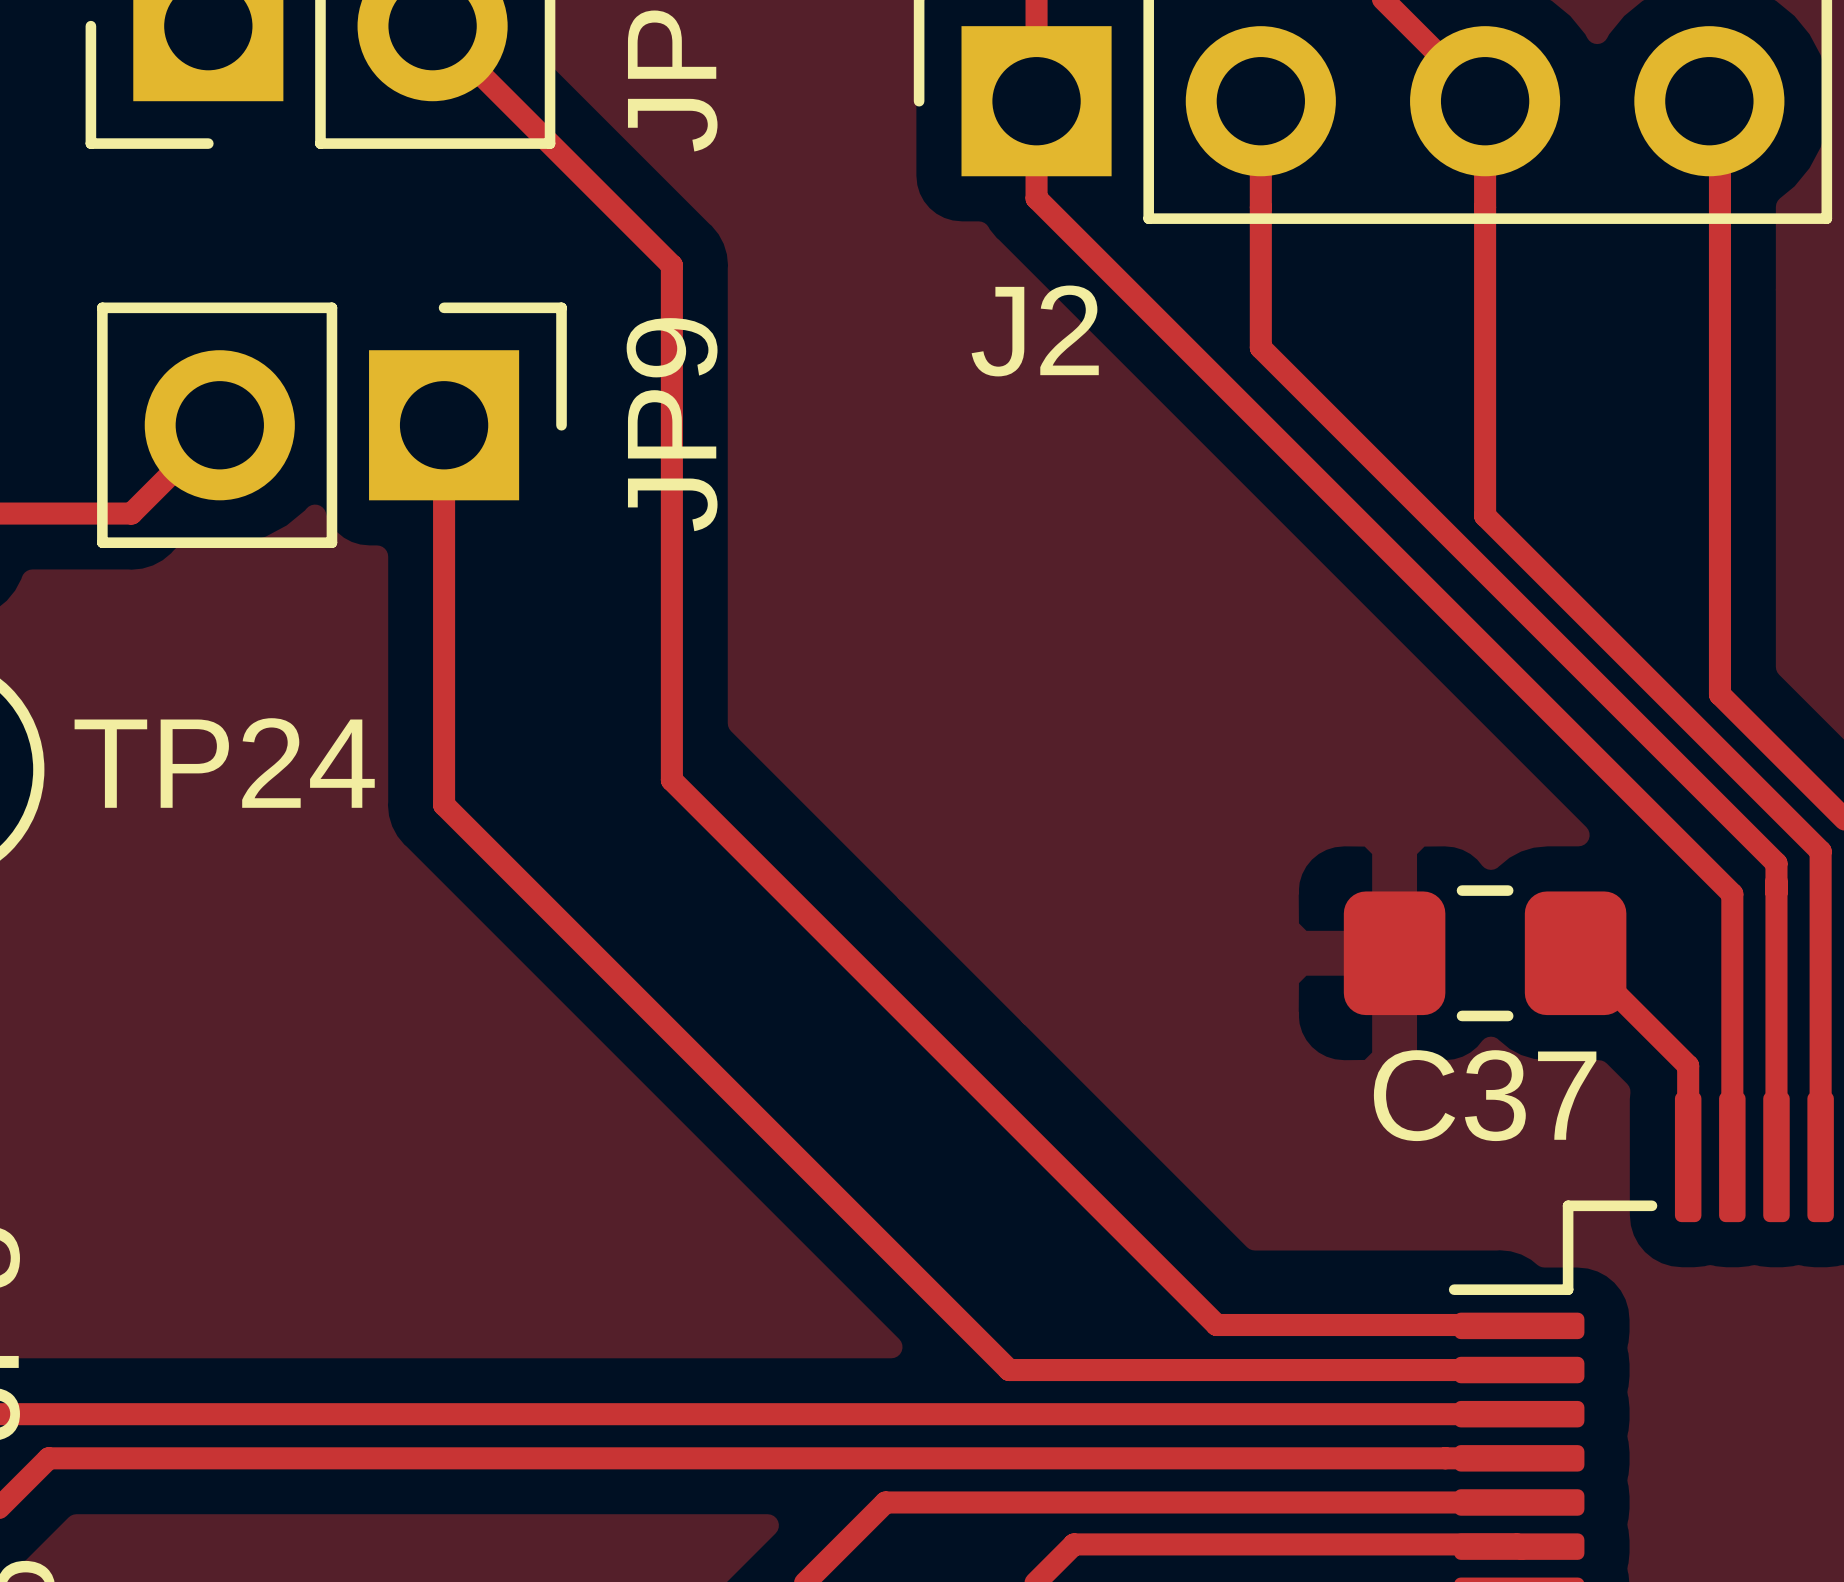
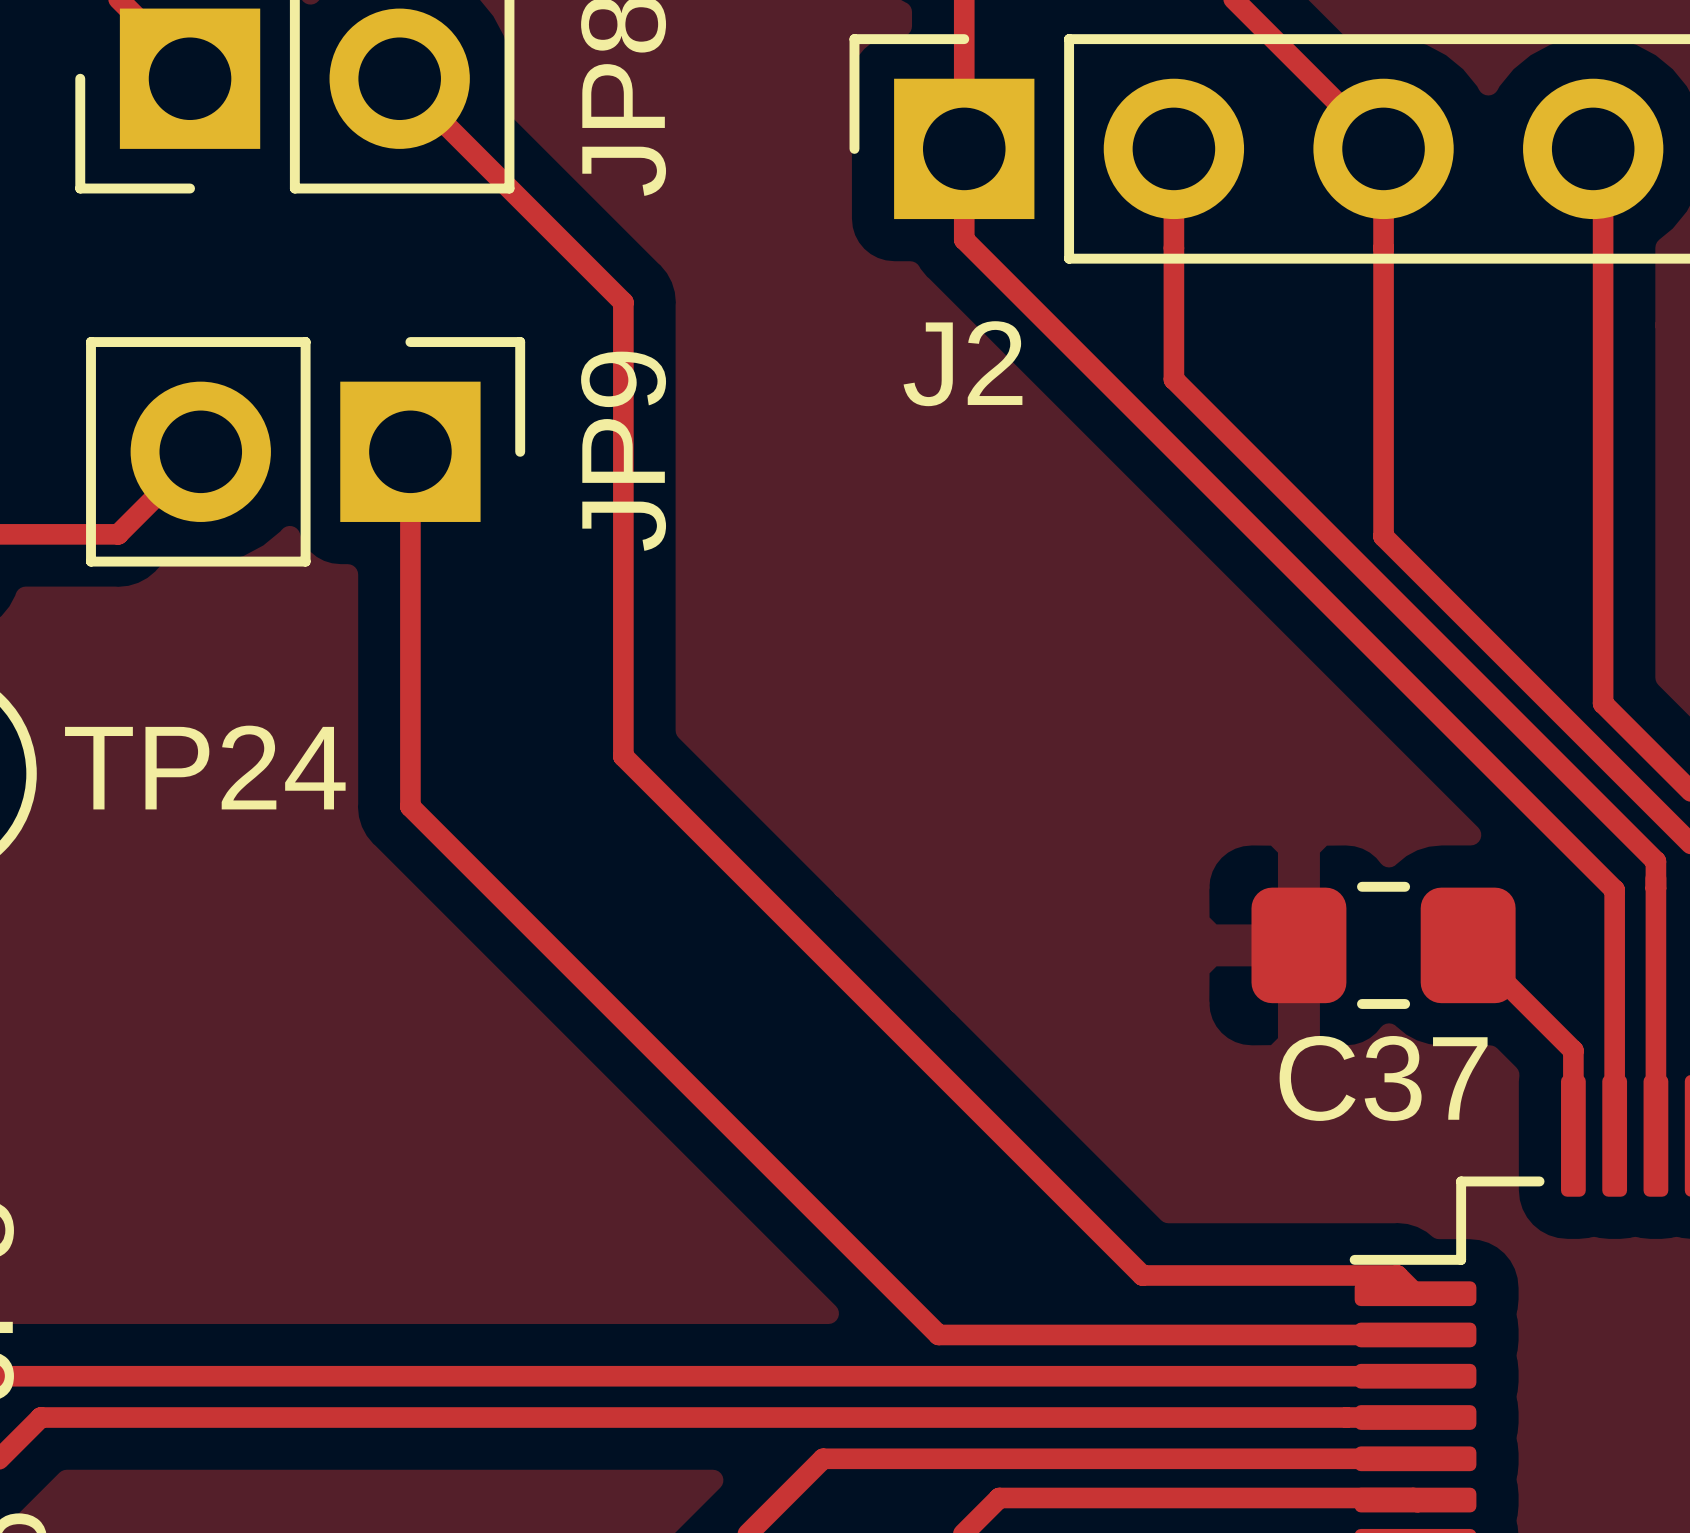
track: (671, 751) (671, 780) (1216, 1325) (1499, 1325) -> (623, 756) (1142, 1275) (1397, 1275) (1415, 1293)

